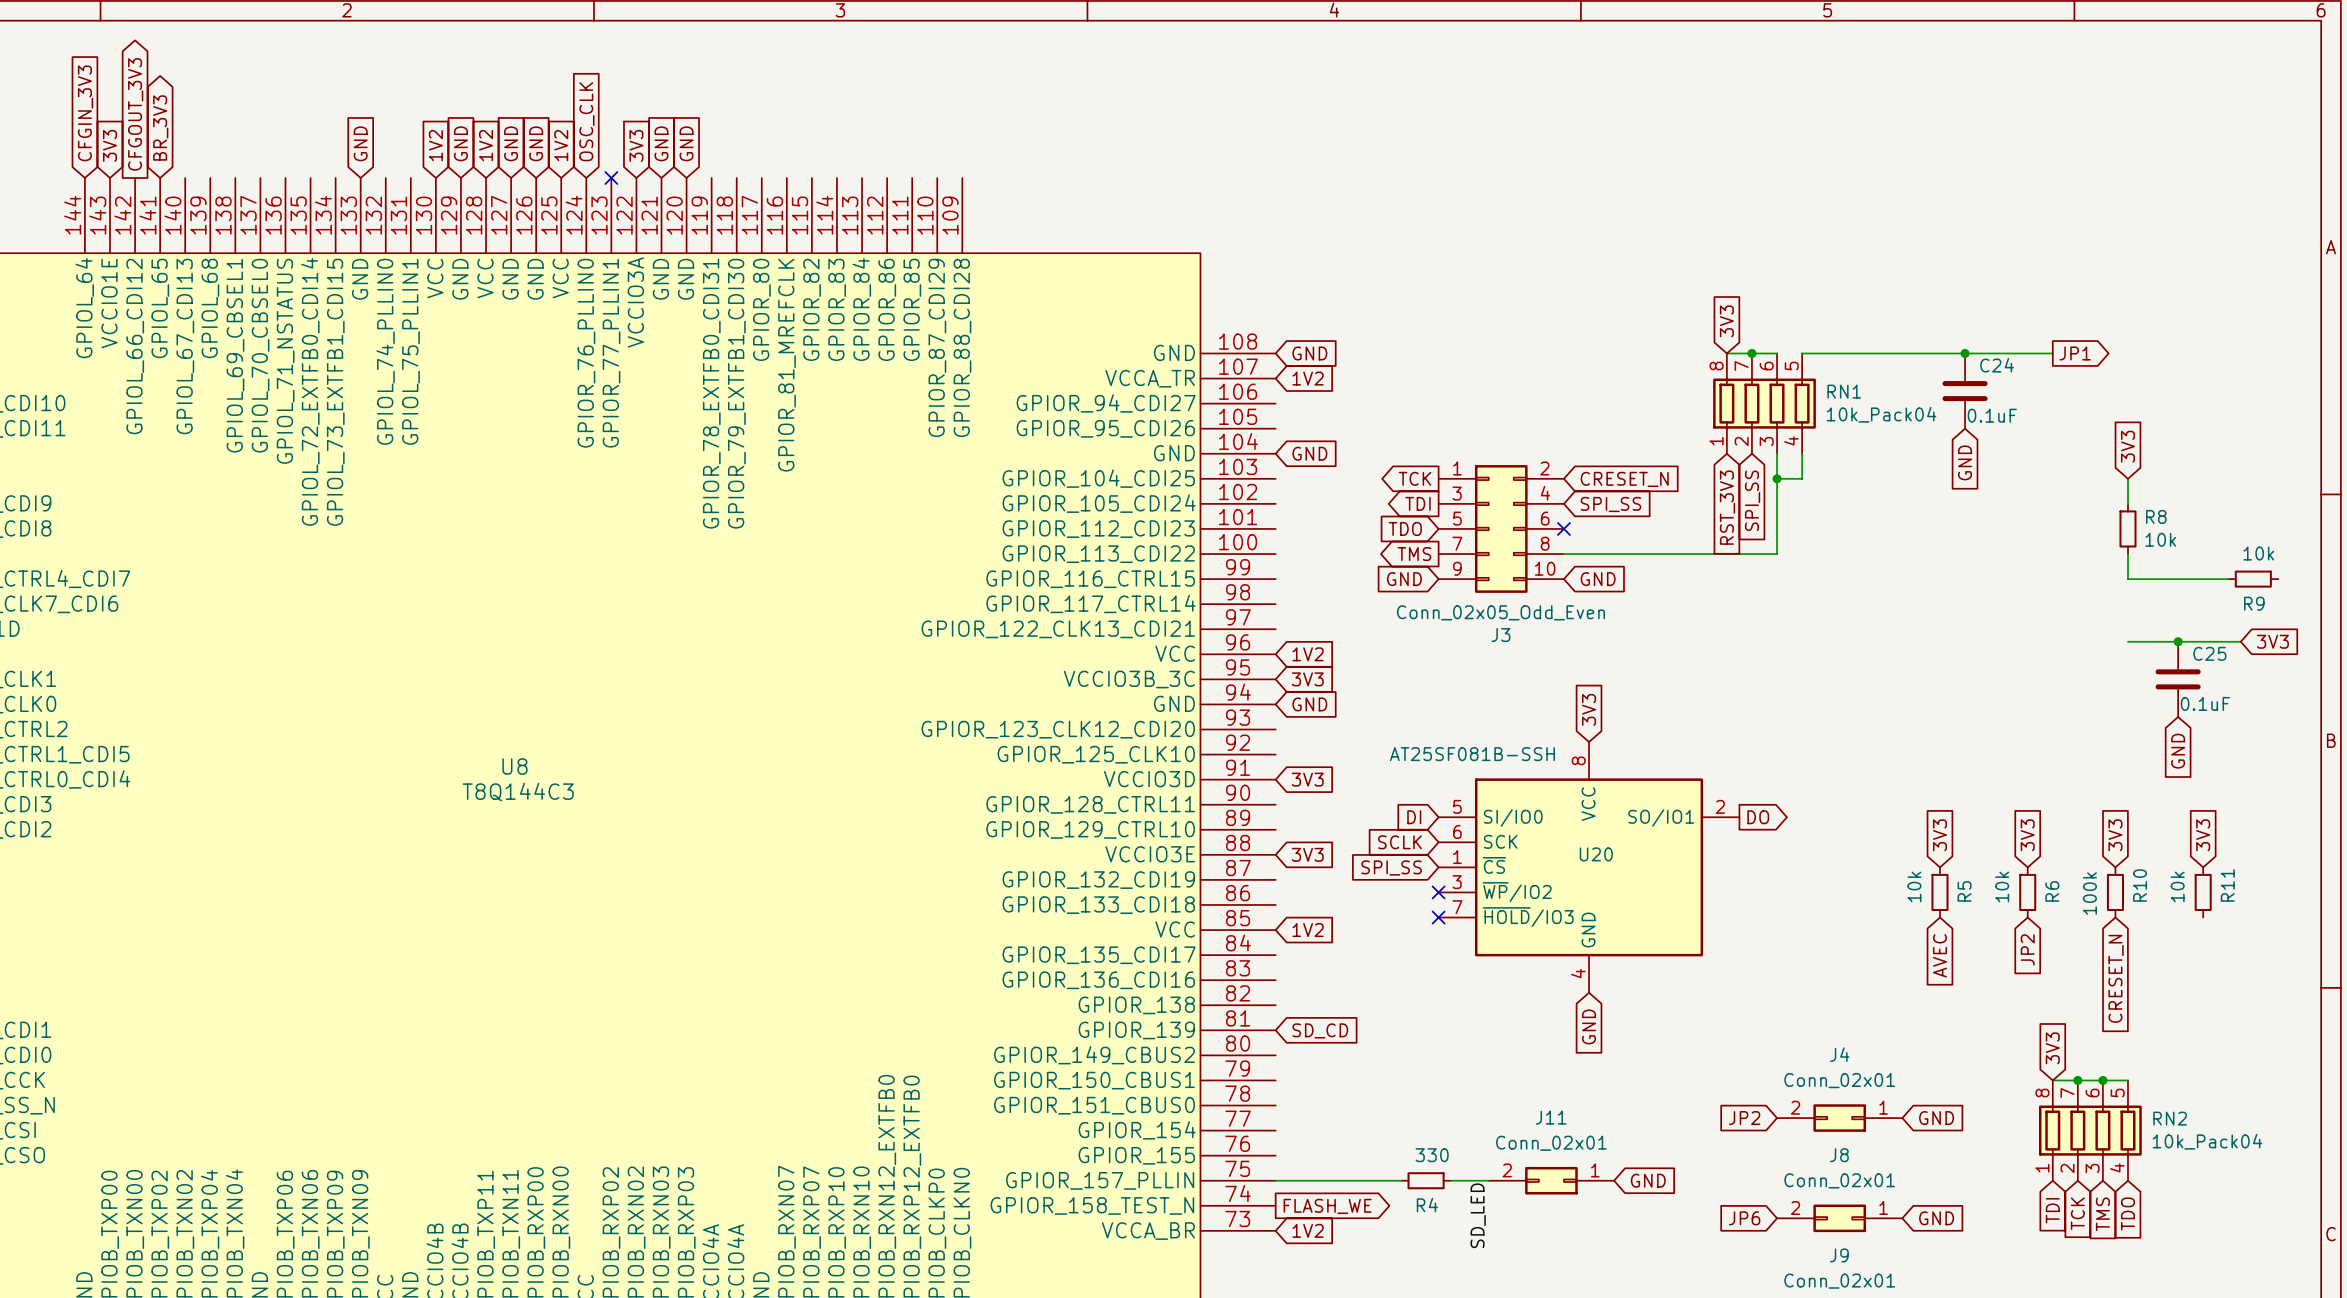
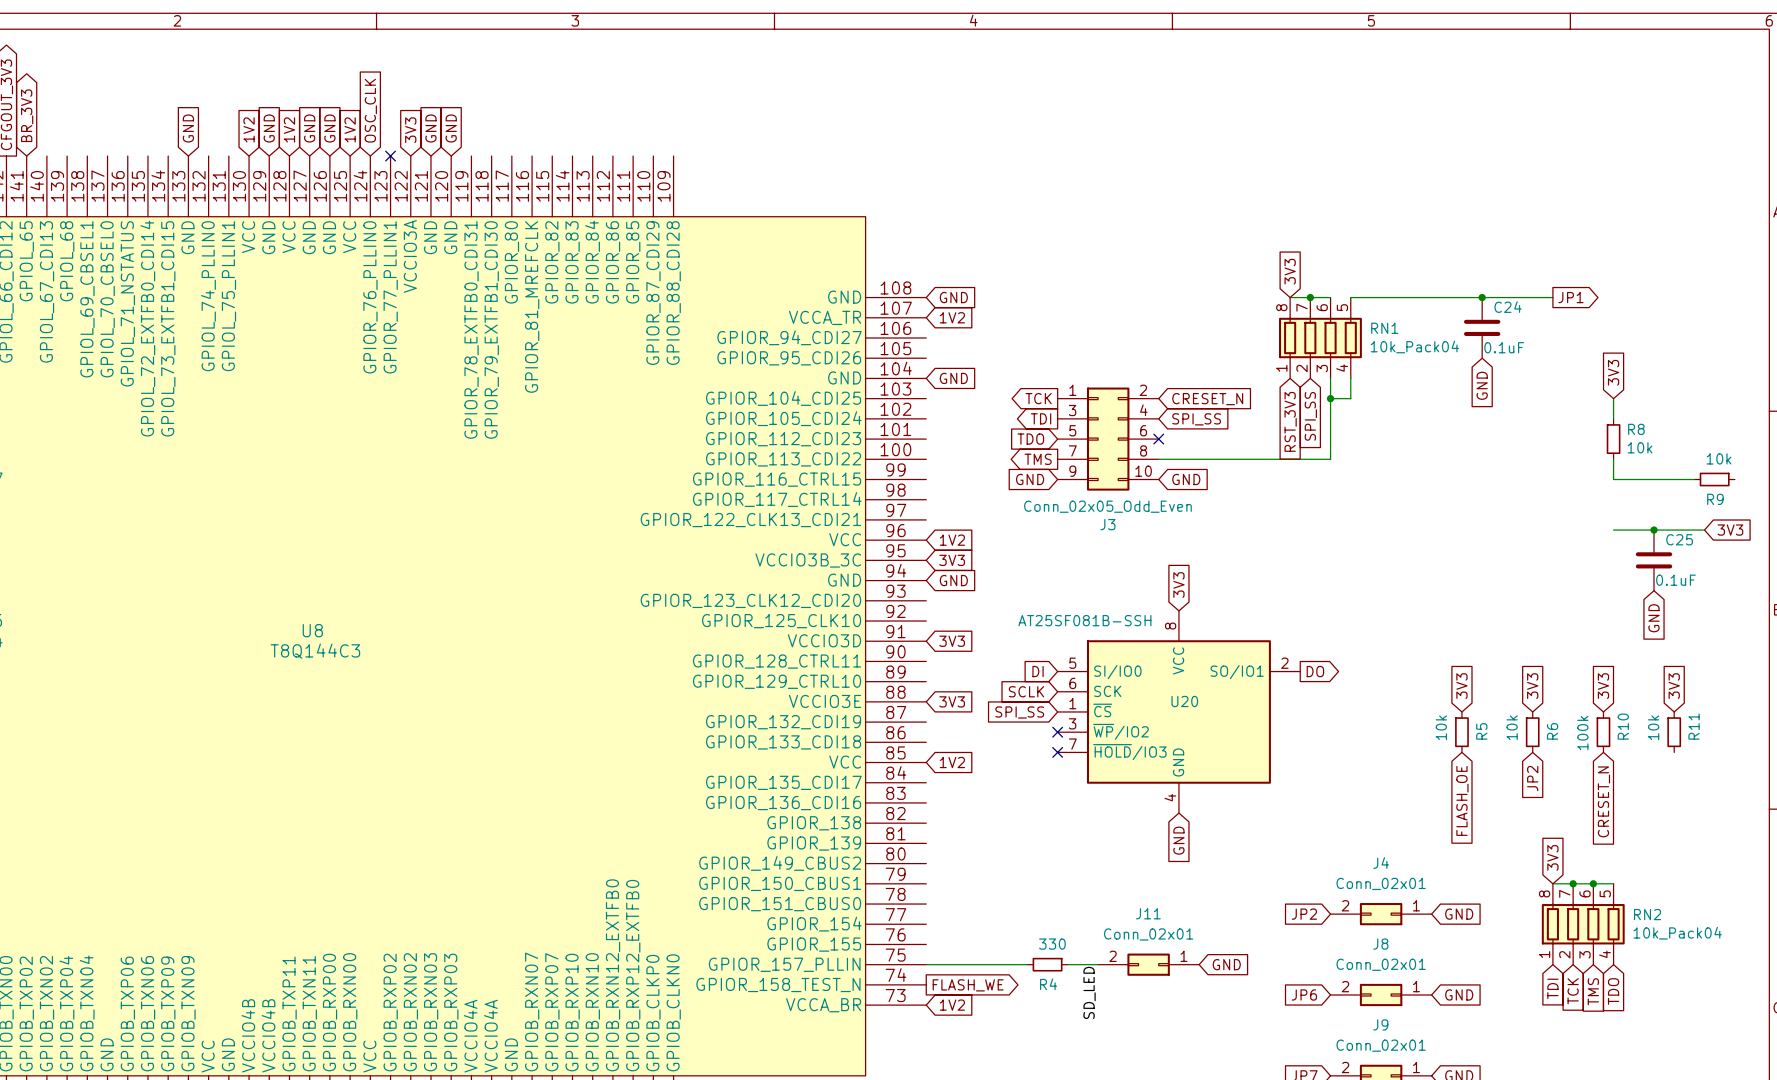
global label: AVEC (1939, 955) -> FLASH_OE (1462, 800)
global label: SD_CD (1320, 1030) -> none

